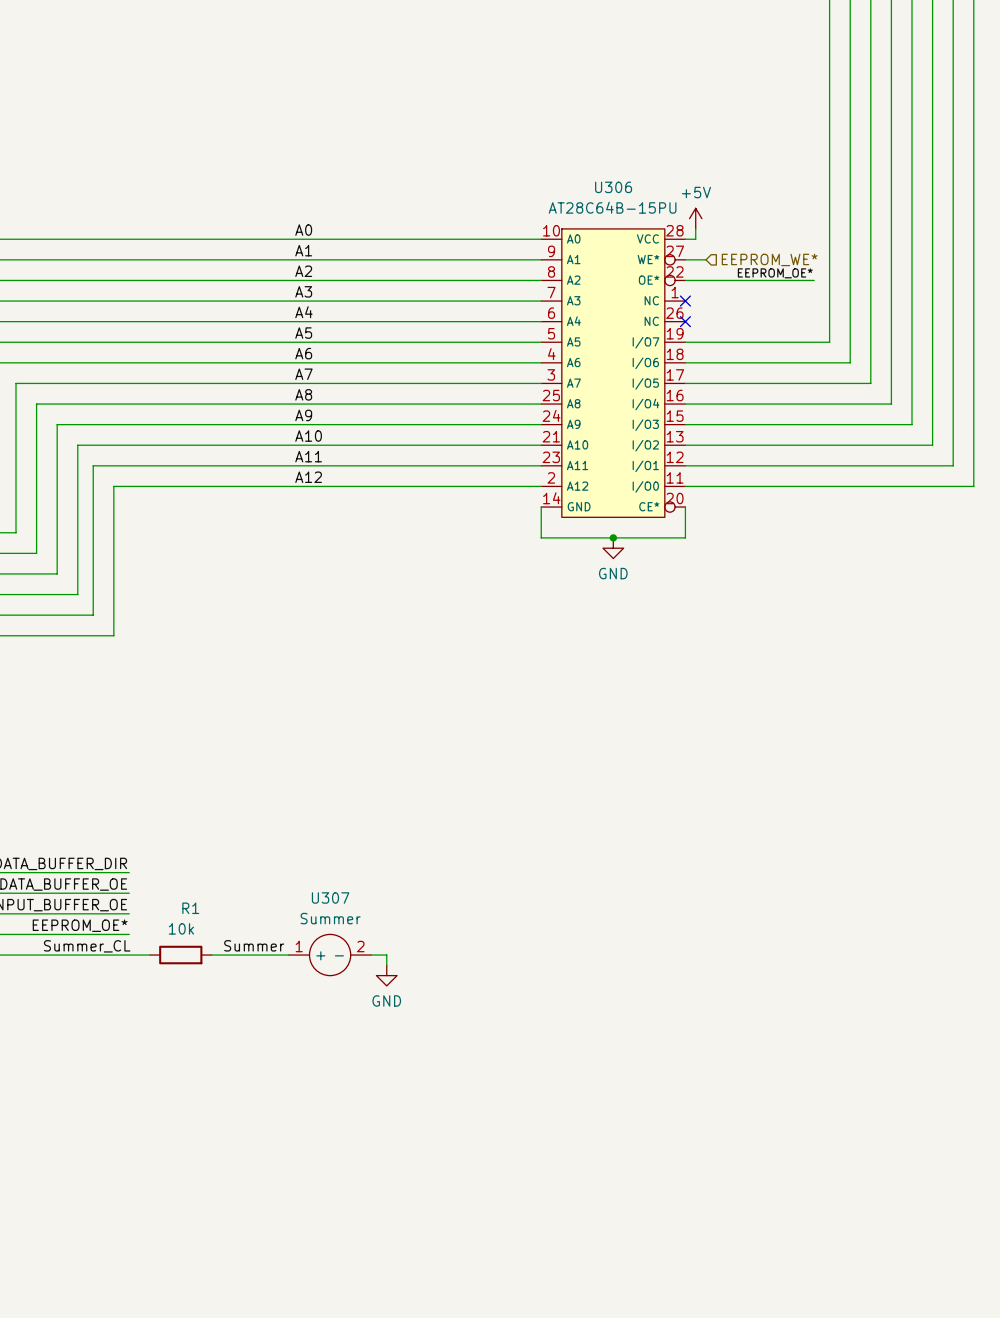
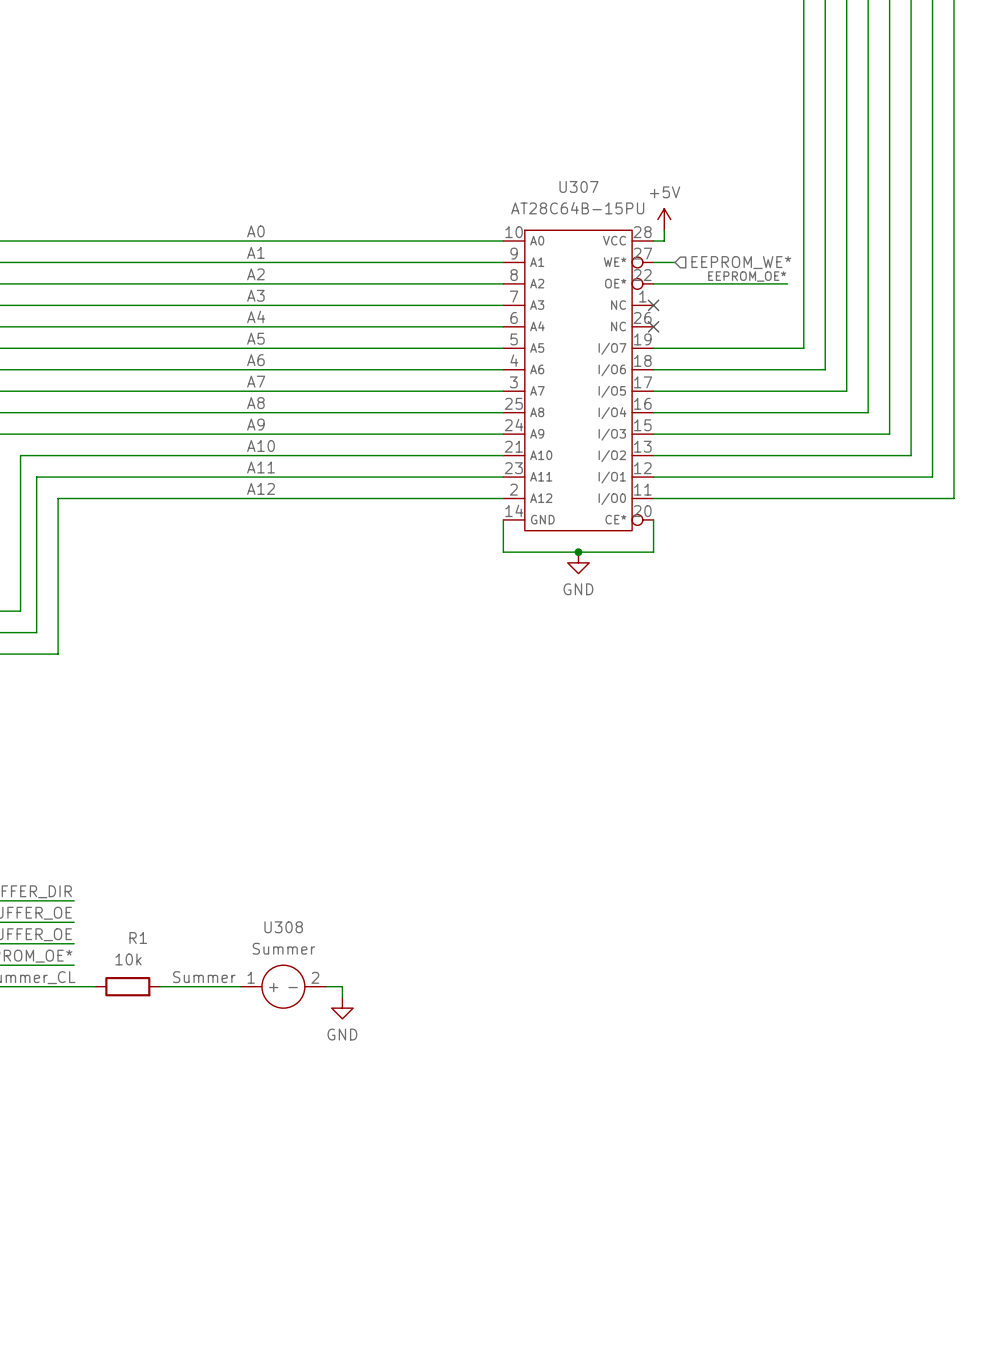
U306 name: U306 (613, 187) -> U307 (578, 186)
U307 name: U307 (330, 897) -> U308 (283, 927)

